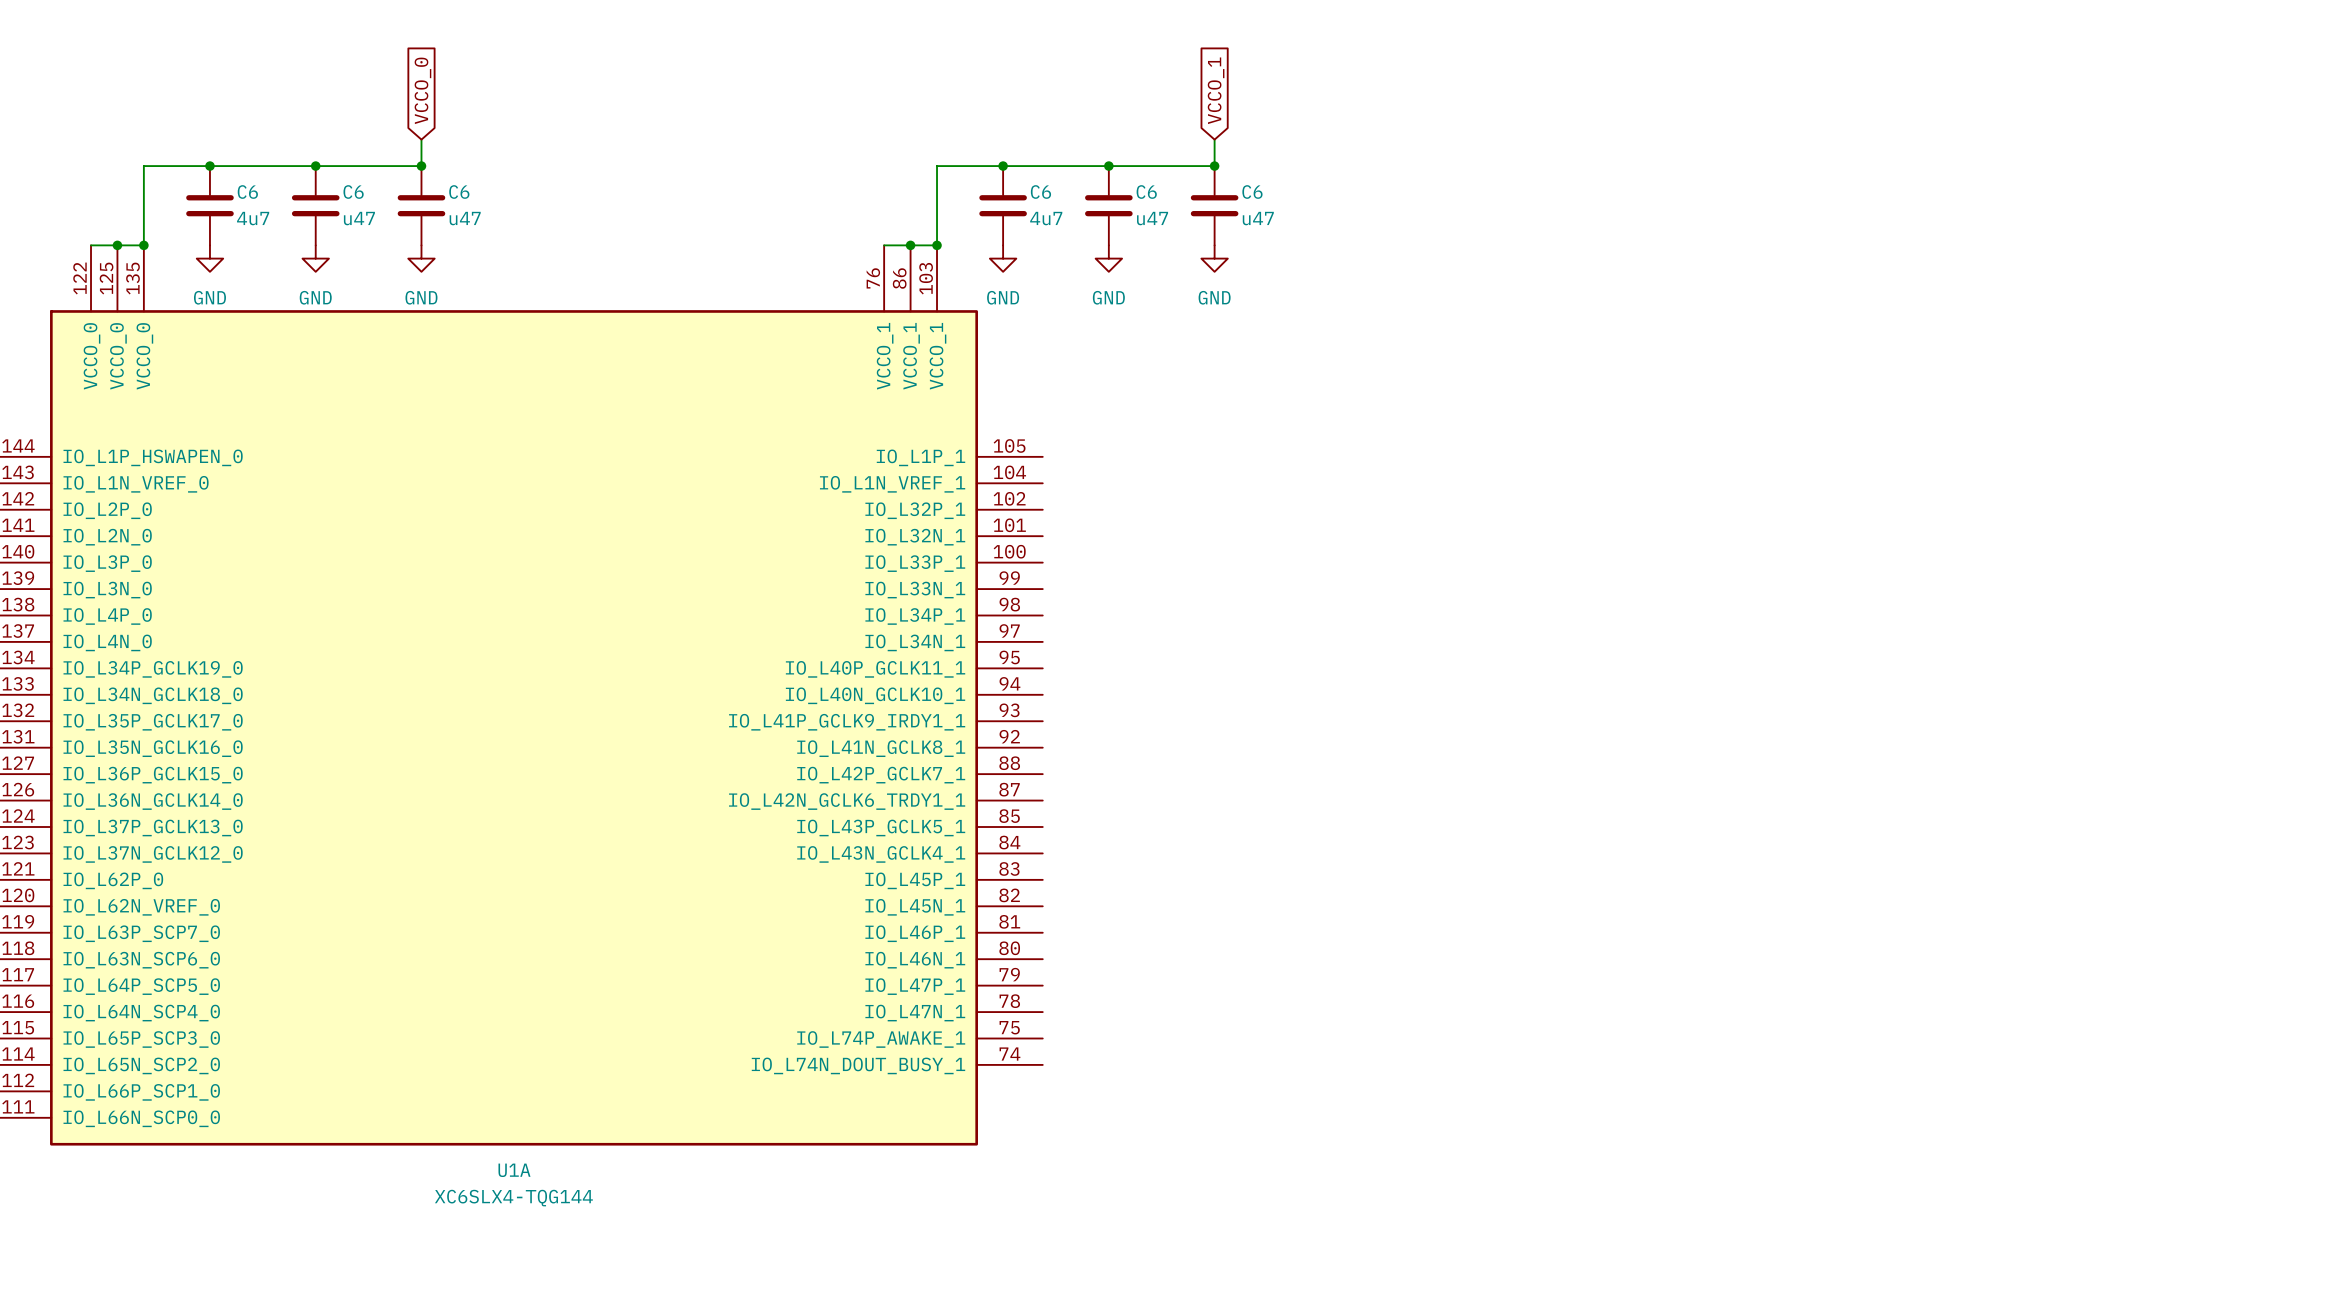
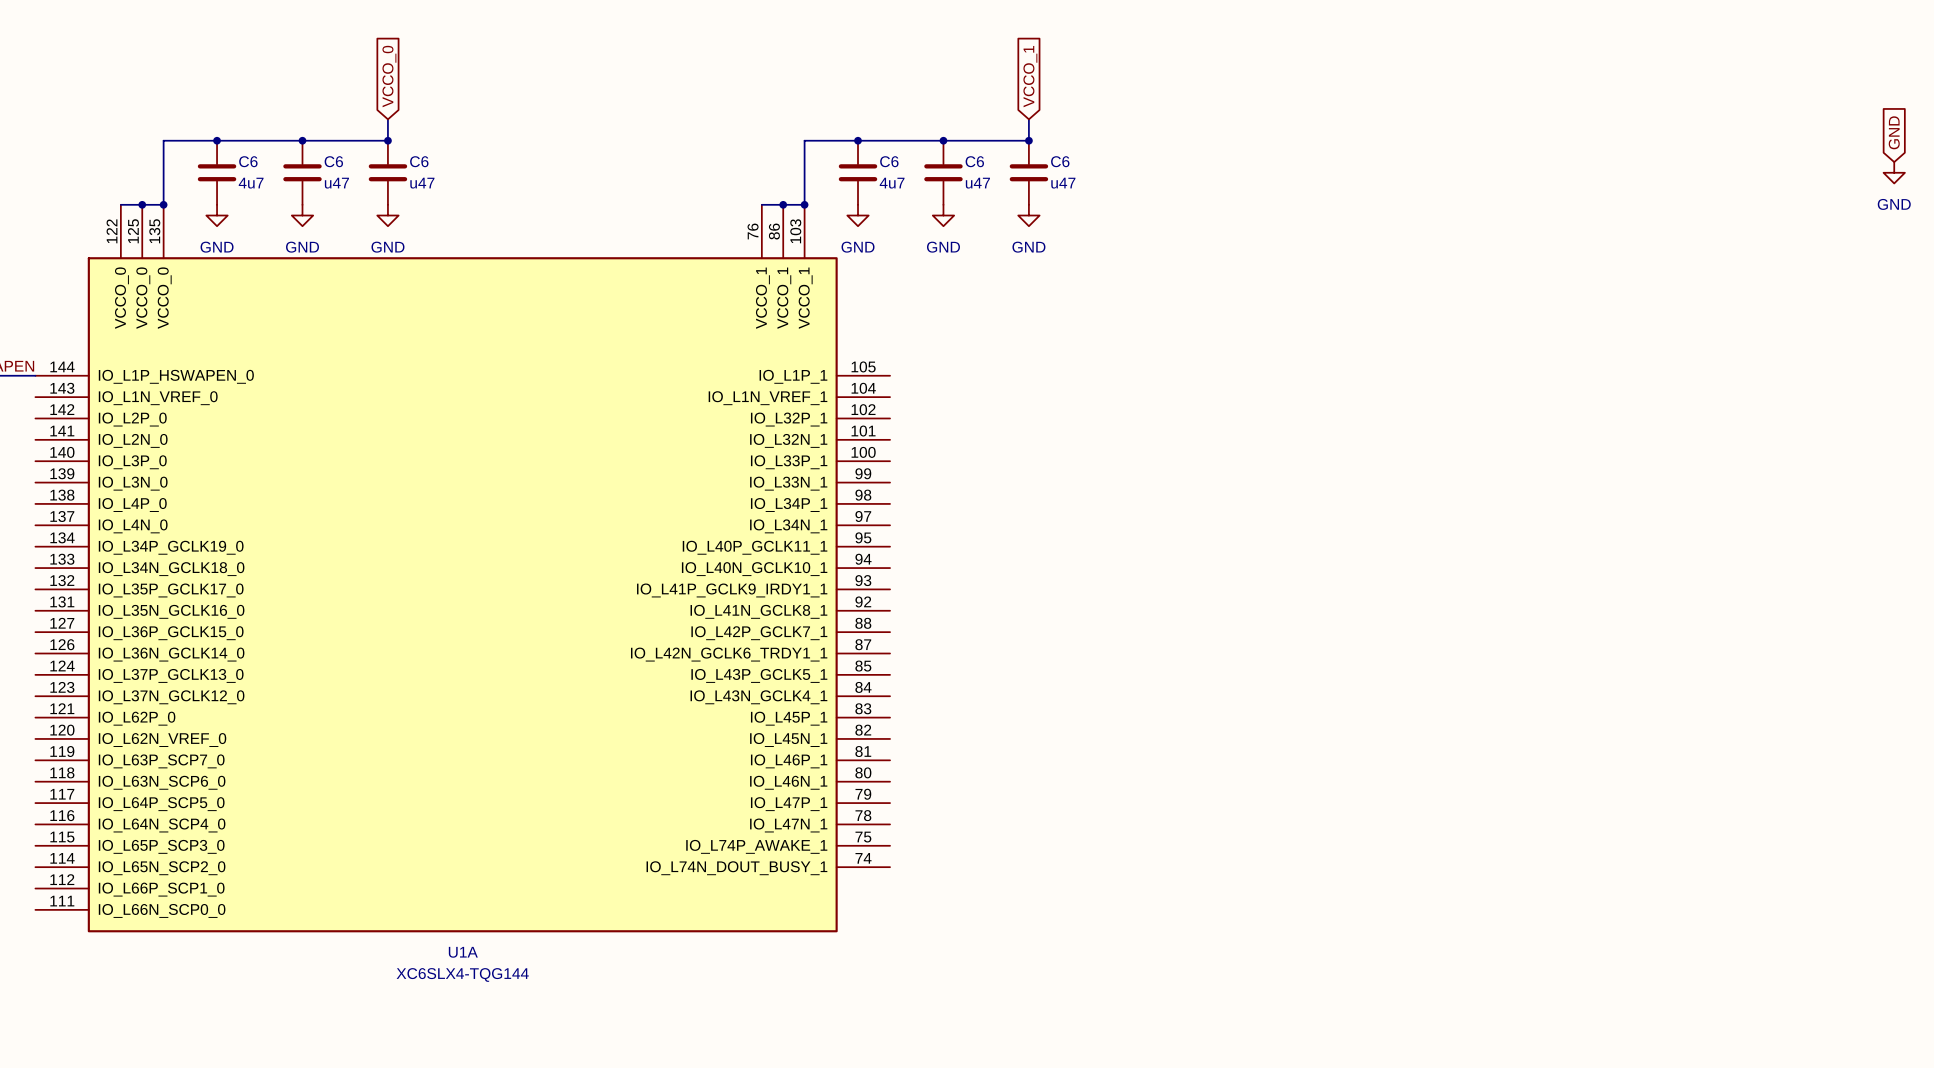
global label: none -> GND (1894, 132)
power symbol: none -> GND (1894, 172)

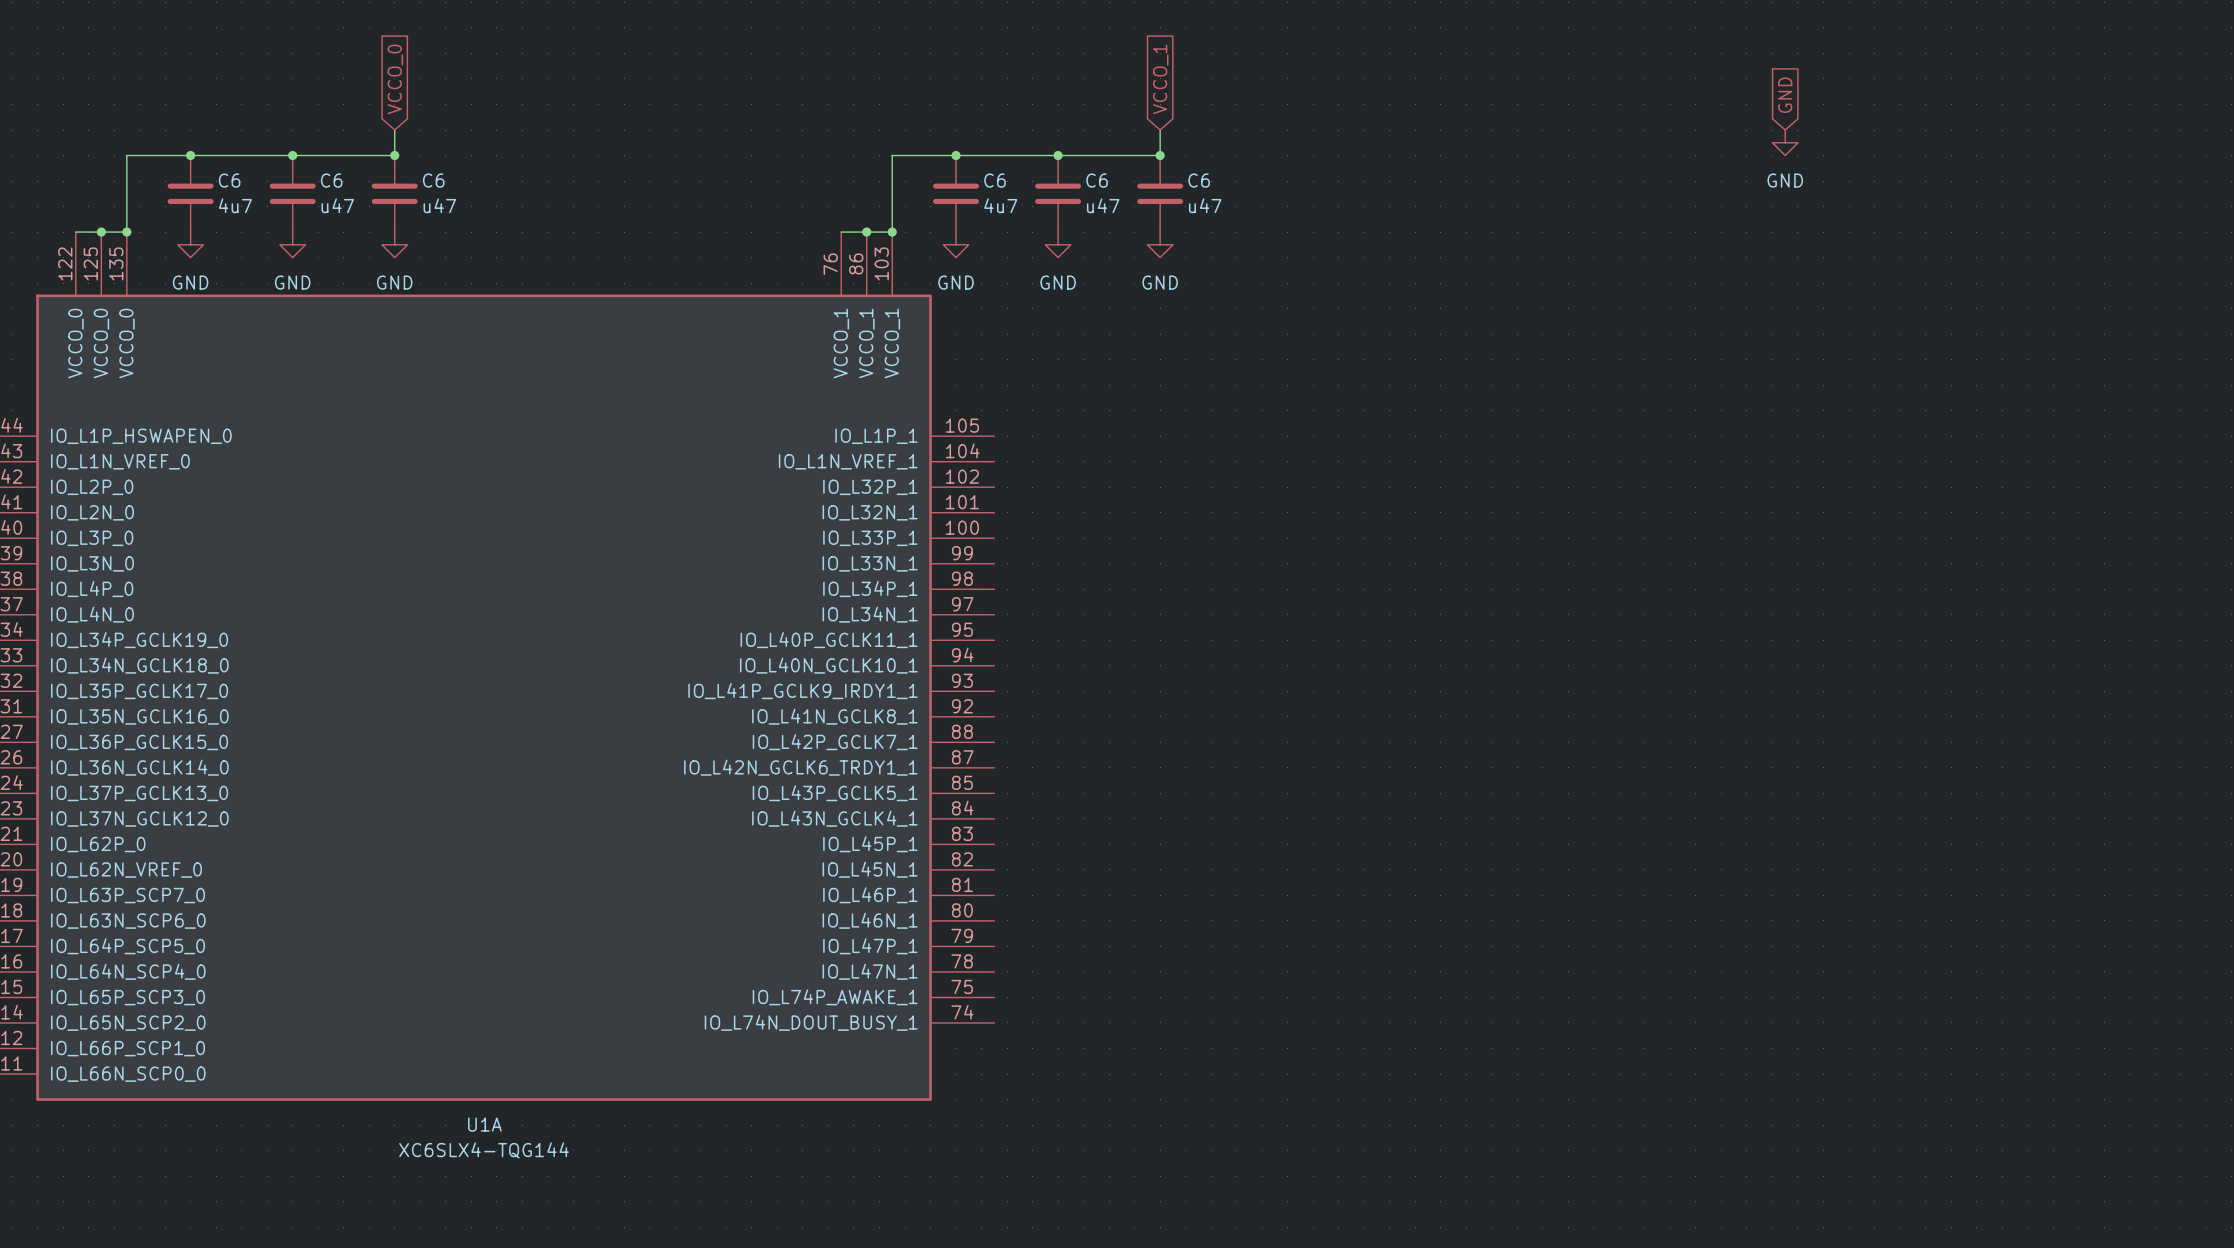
global label: none -> GND (1785, 95)
power symbol: none -> GND (1785, 142)
global label: GND (1894, 132) -> none
power symbol: GND (1894, 172) -> none

